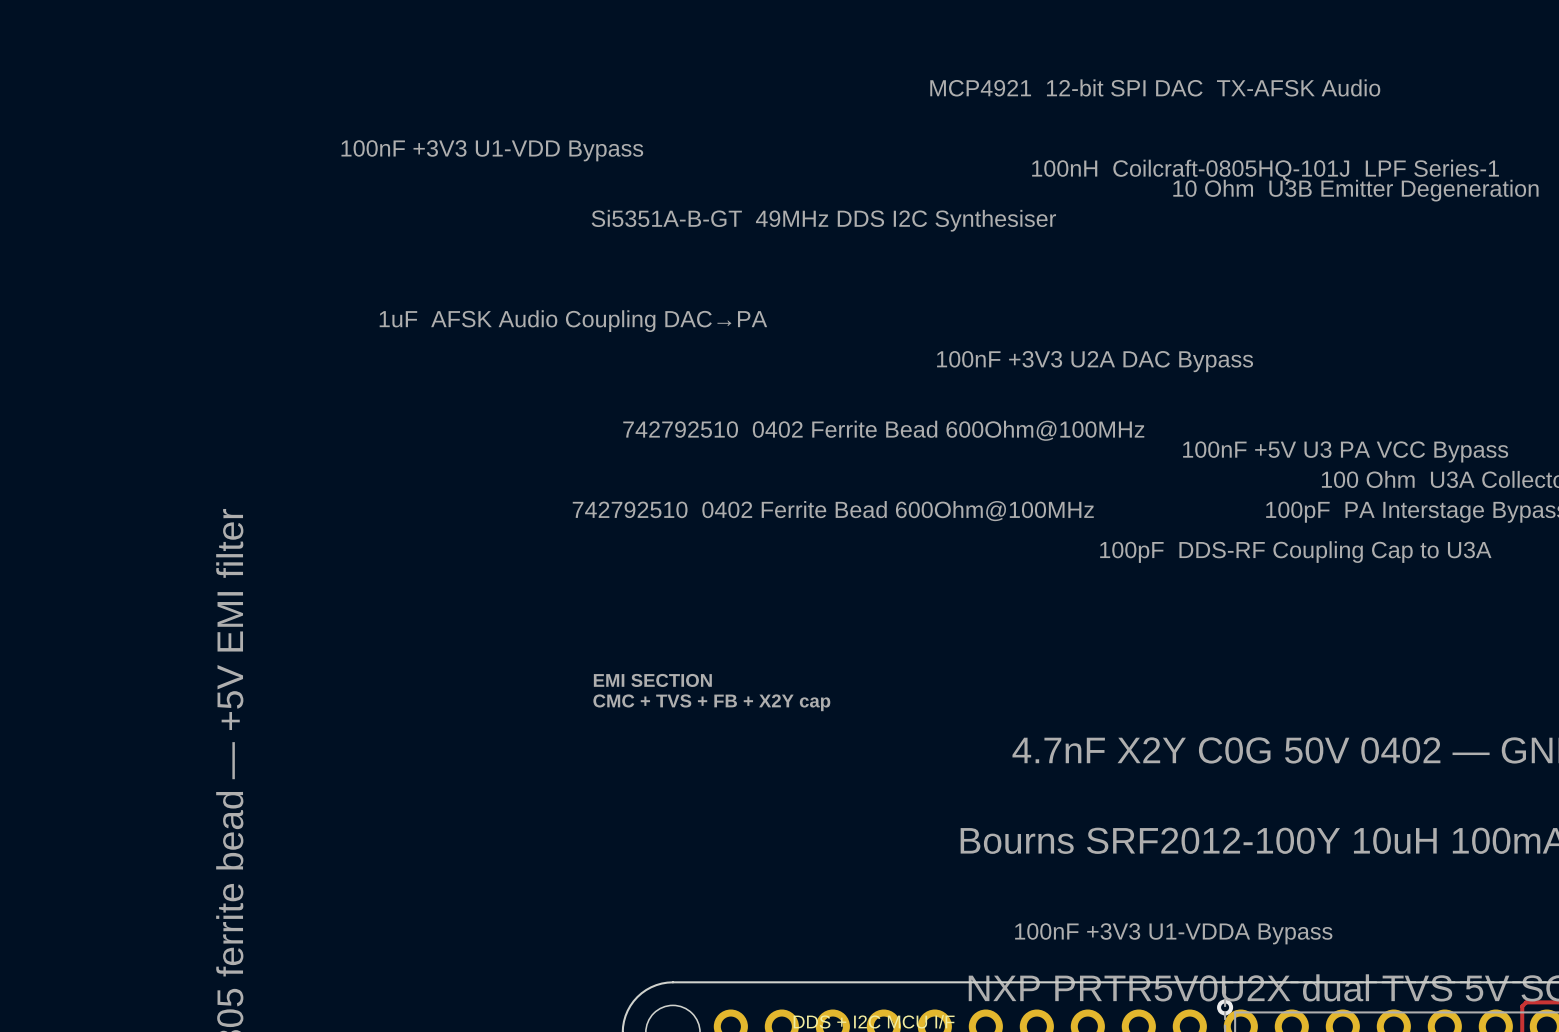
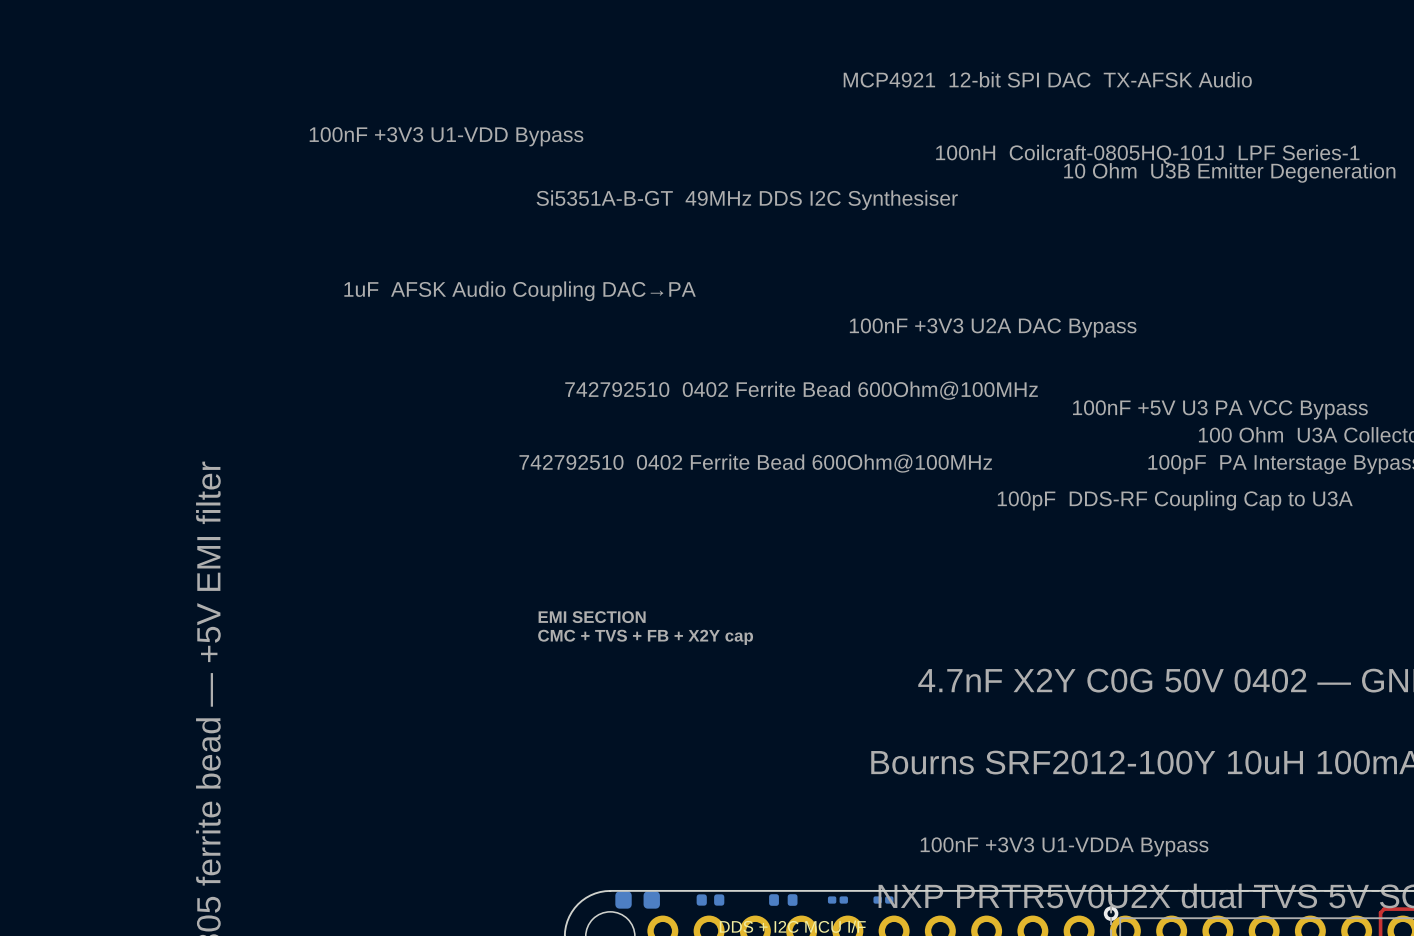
part: none -> (637, 900)
part: none -> (710, 900)
part: none -> (783, 900)
part: none -> (837, 900)
part: none -> (883, 900)

